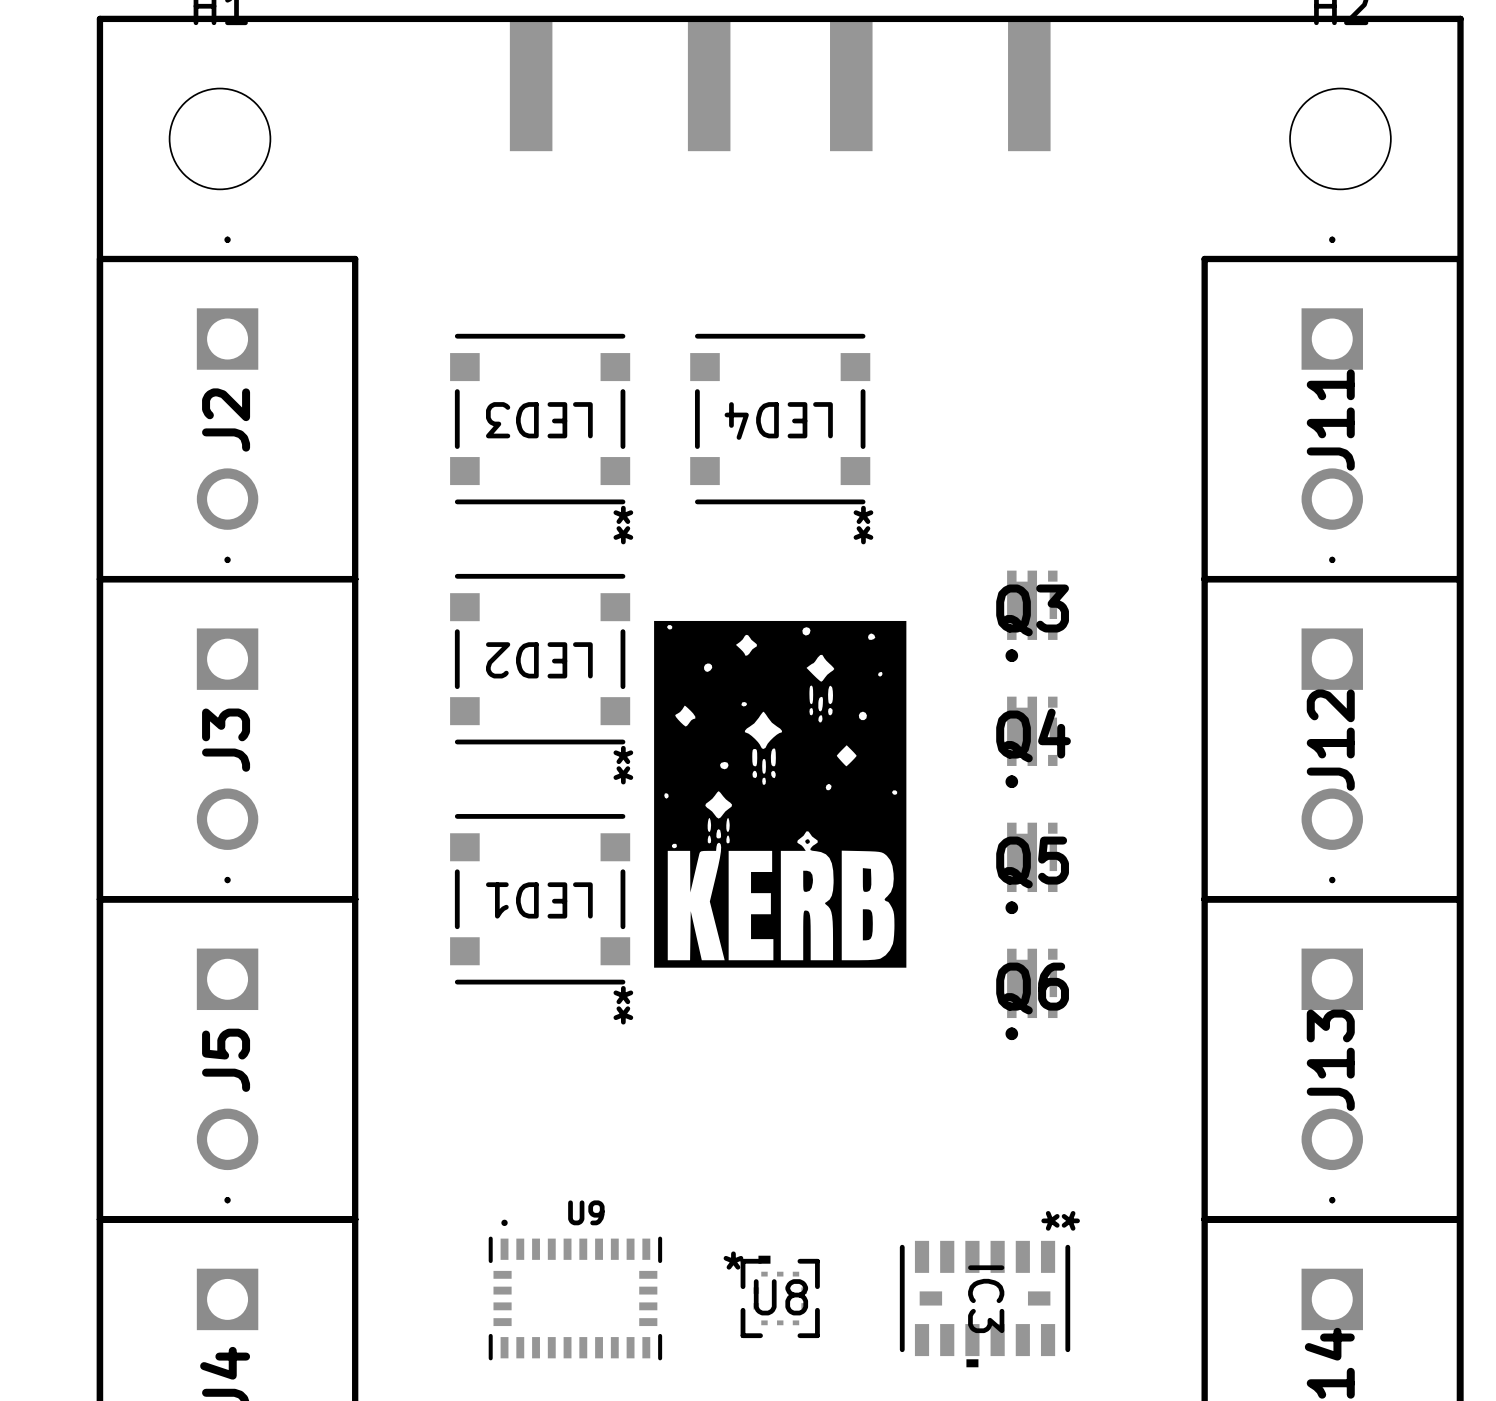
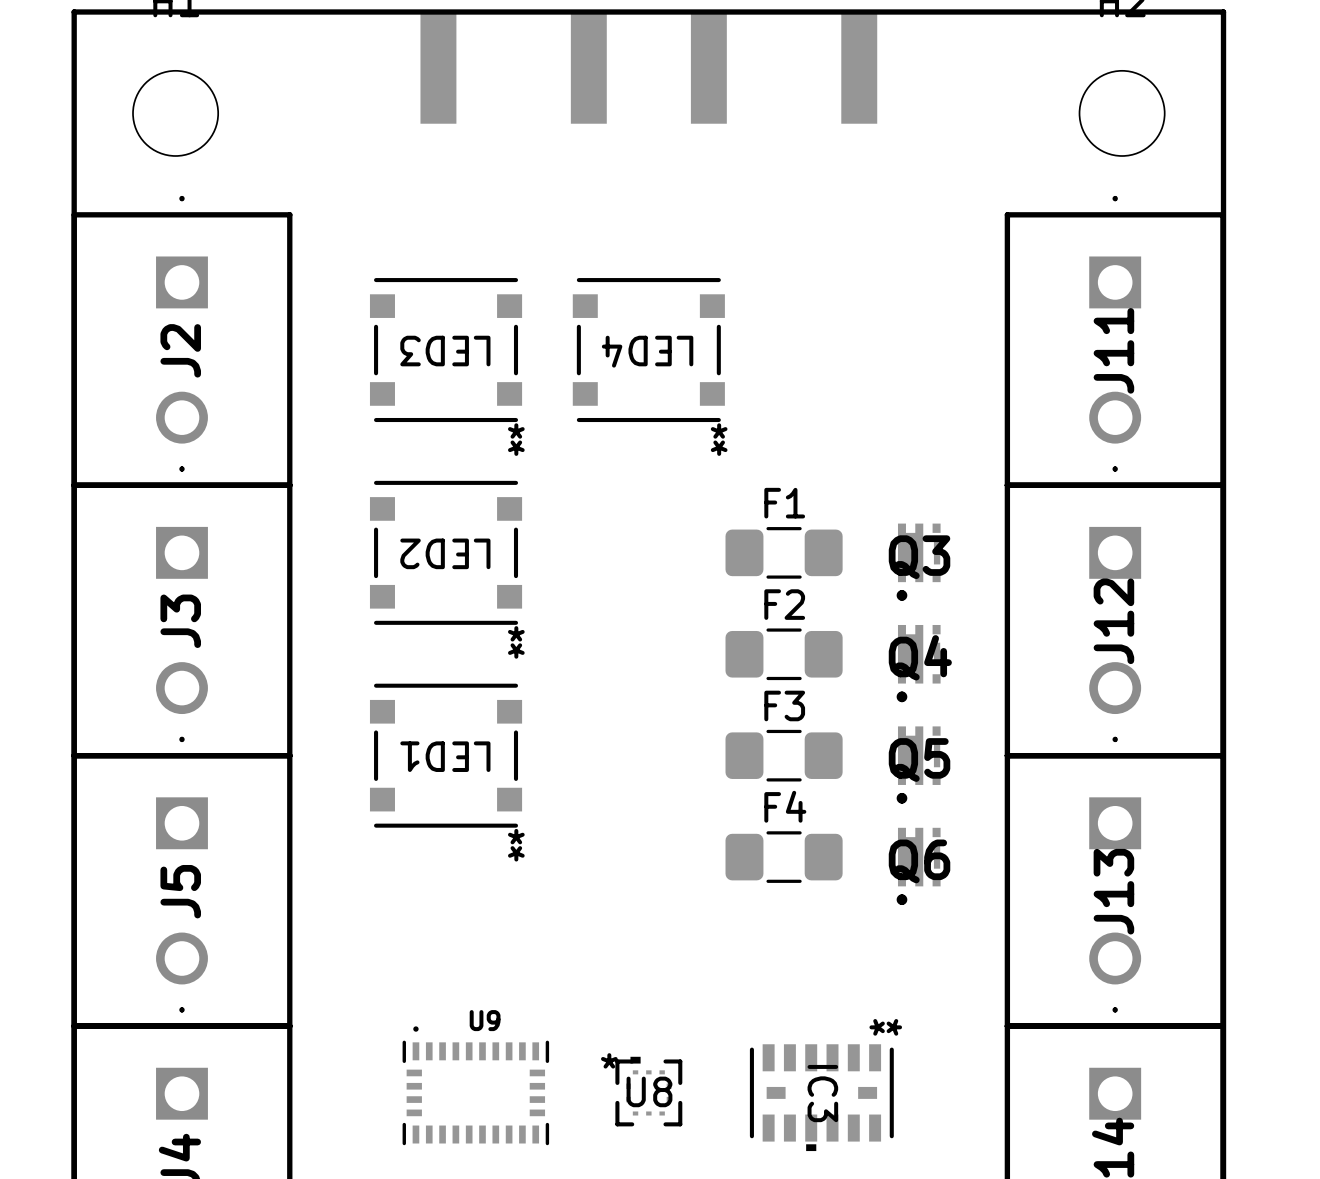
Q3 position: (1031, 616) -> (918, 562)
drawing: [654, 620, 907, 968] -> none
F1: none -> (784, 552)
Q4 position: (1031, 742) -> (918, 663)
F2: none -> (784, 654)
Q5 position: (1031, 868) -> (918, 765)
F3: none -> (784, 755)
Q6 position: (1031, 994) -> (918, 866)
F4: none -> (784, 857)

